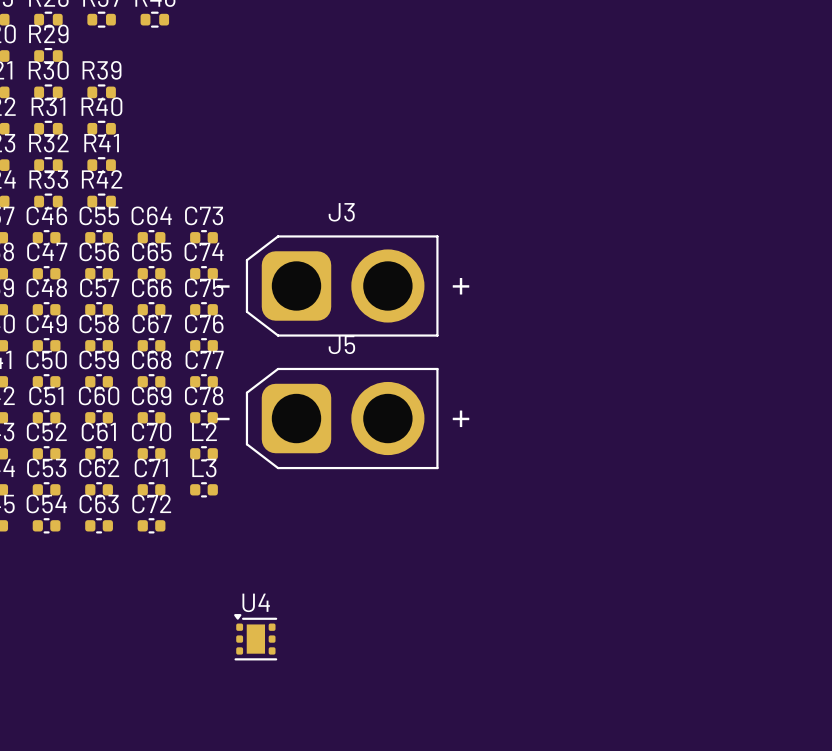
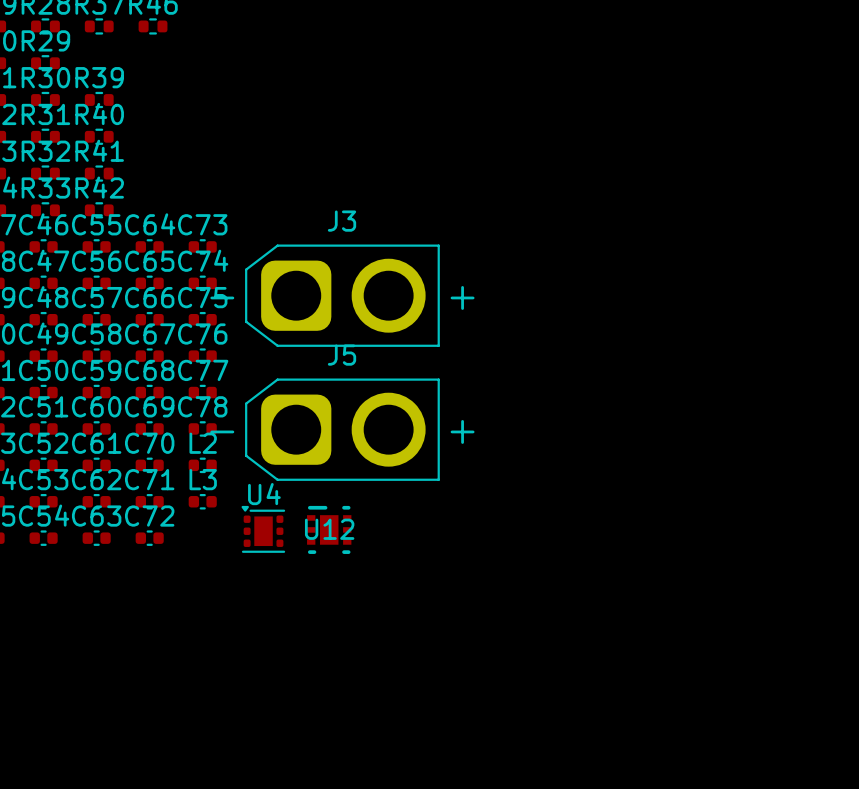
U12: none -> (329, 529)
U4 position: (255, 637) -> (263, 529)

